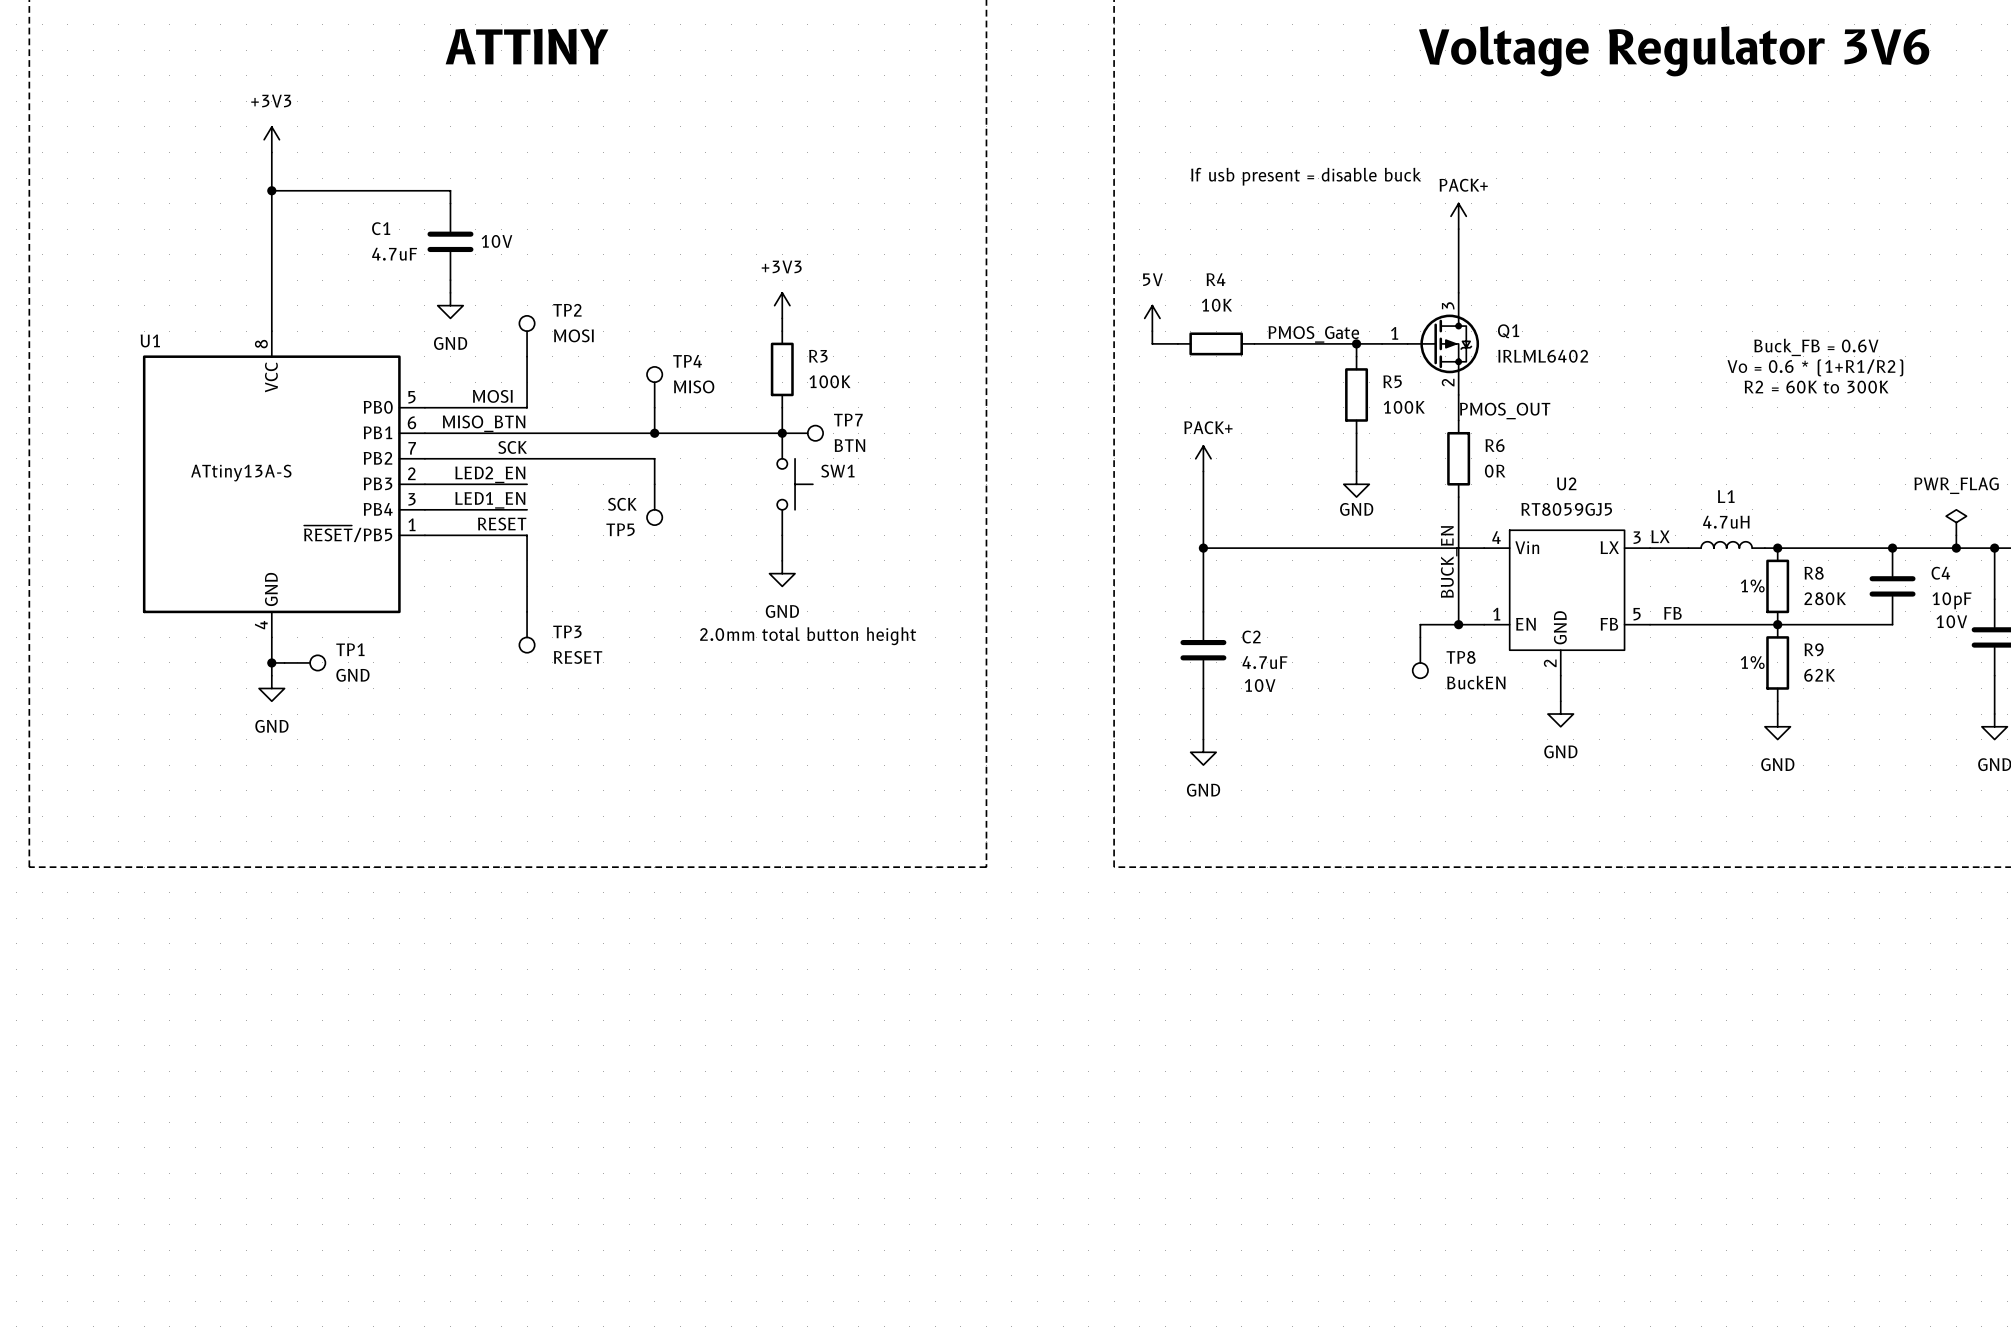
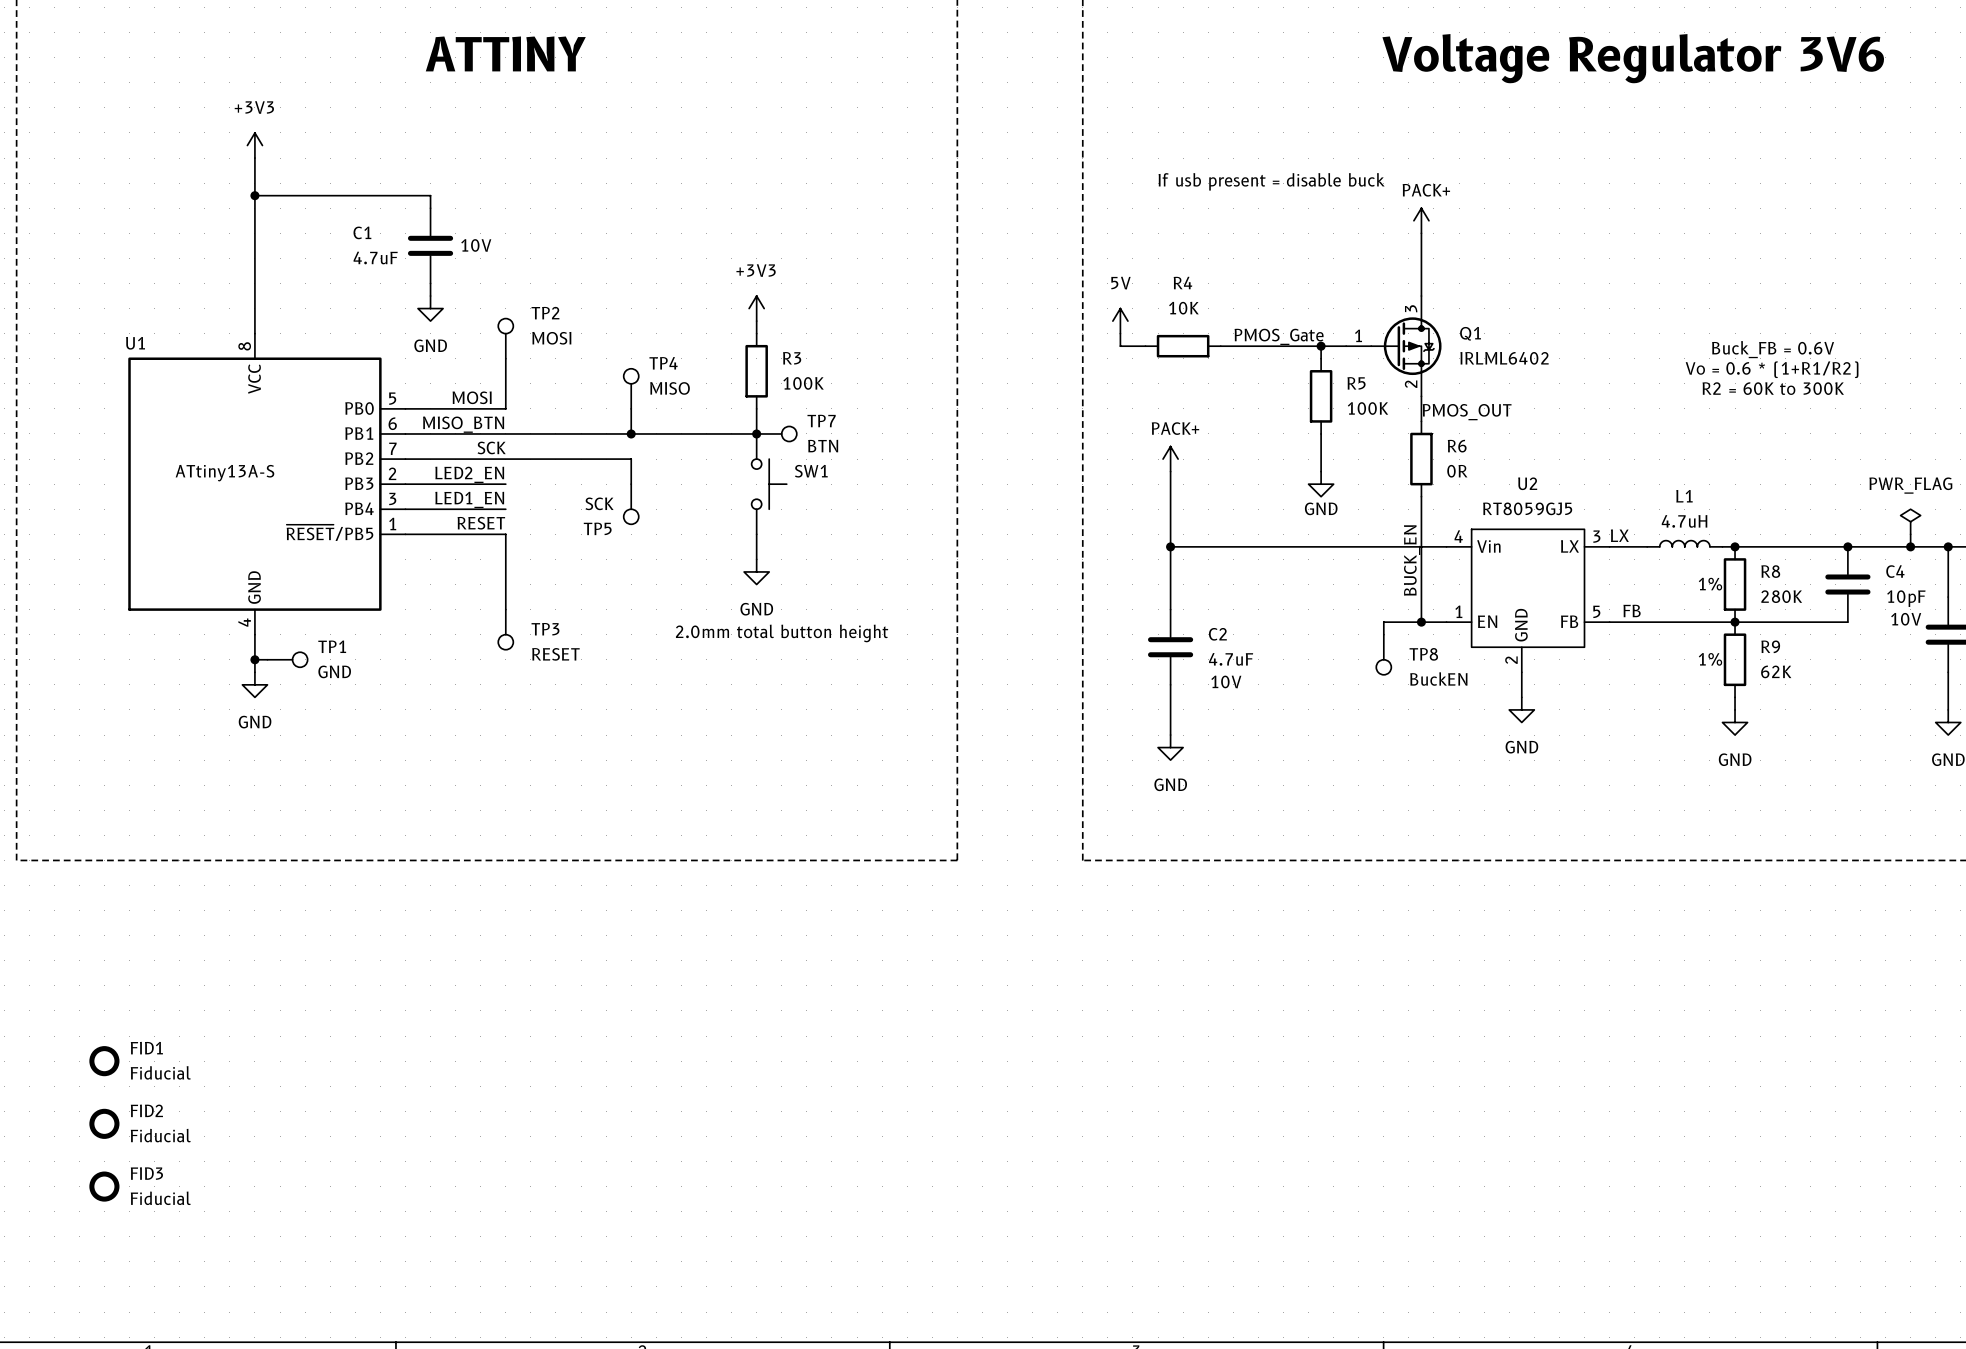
FID1: none -> Fiducial (104, 1061)
FID2: none -> Fiducial (104, 1123)
FID3: none -> Fiducial (104, 1186)

